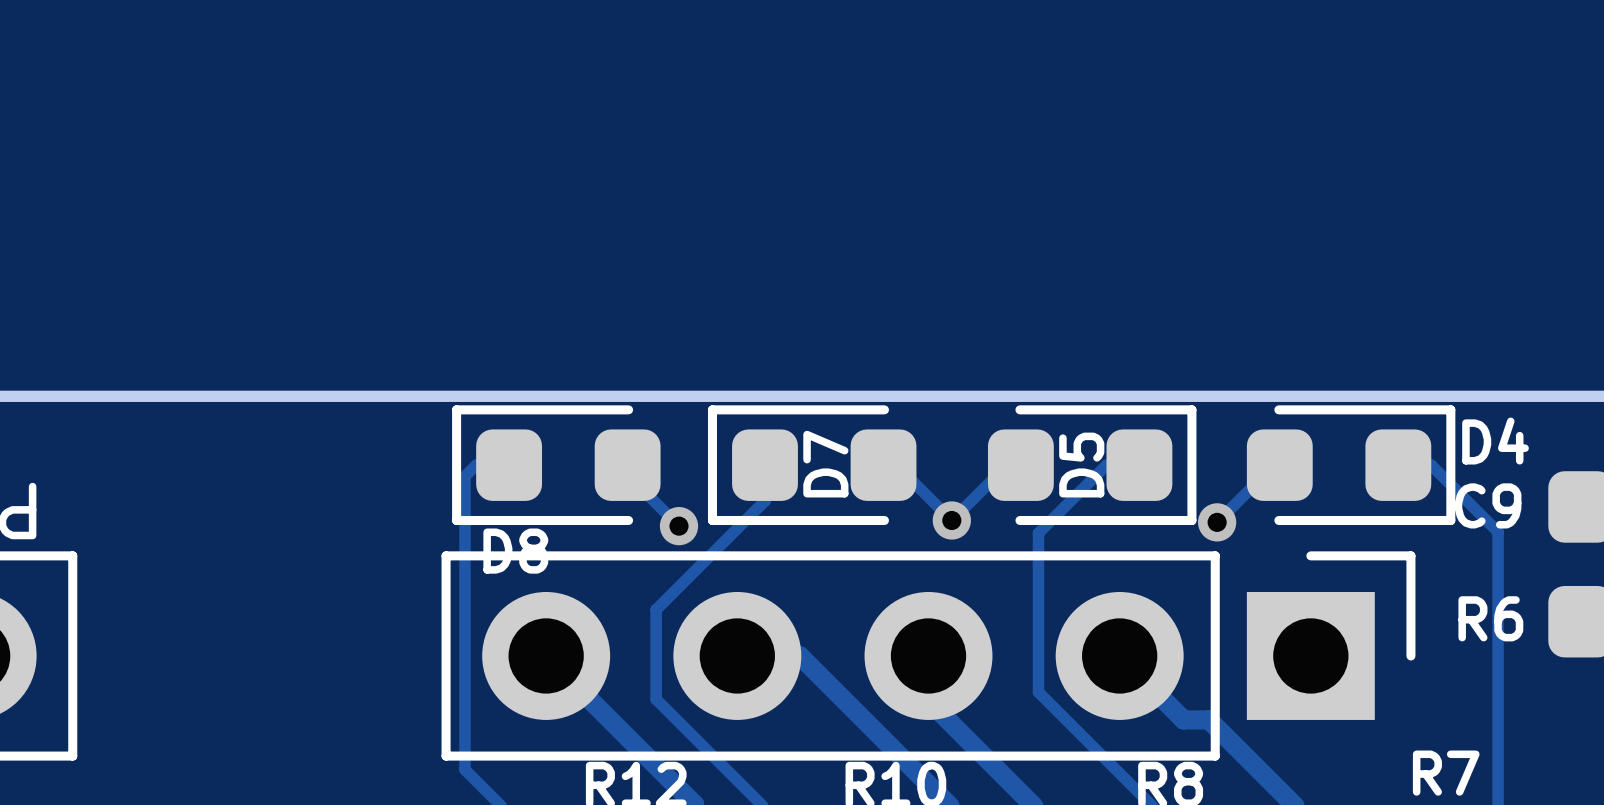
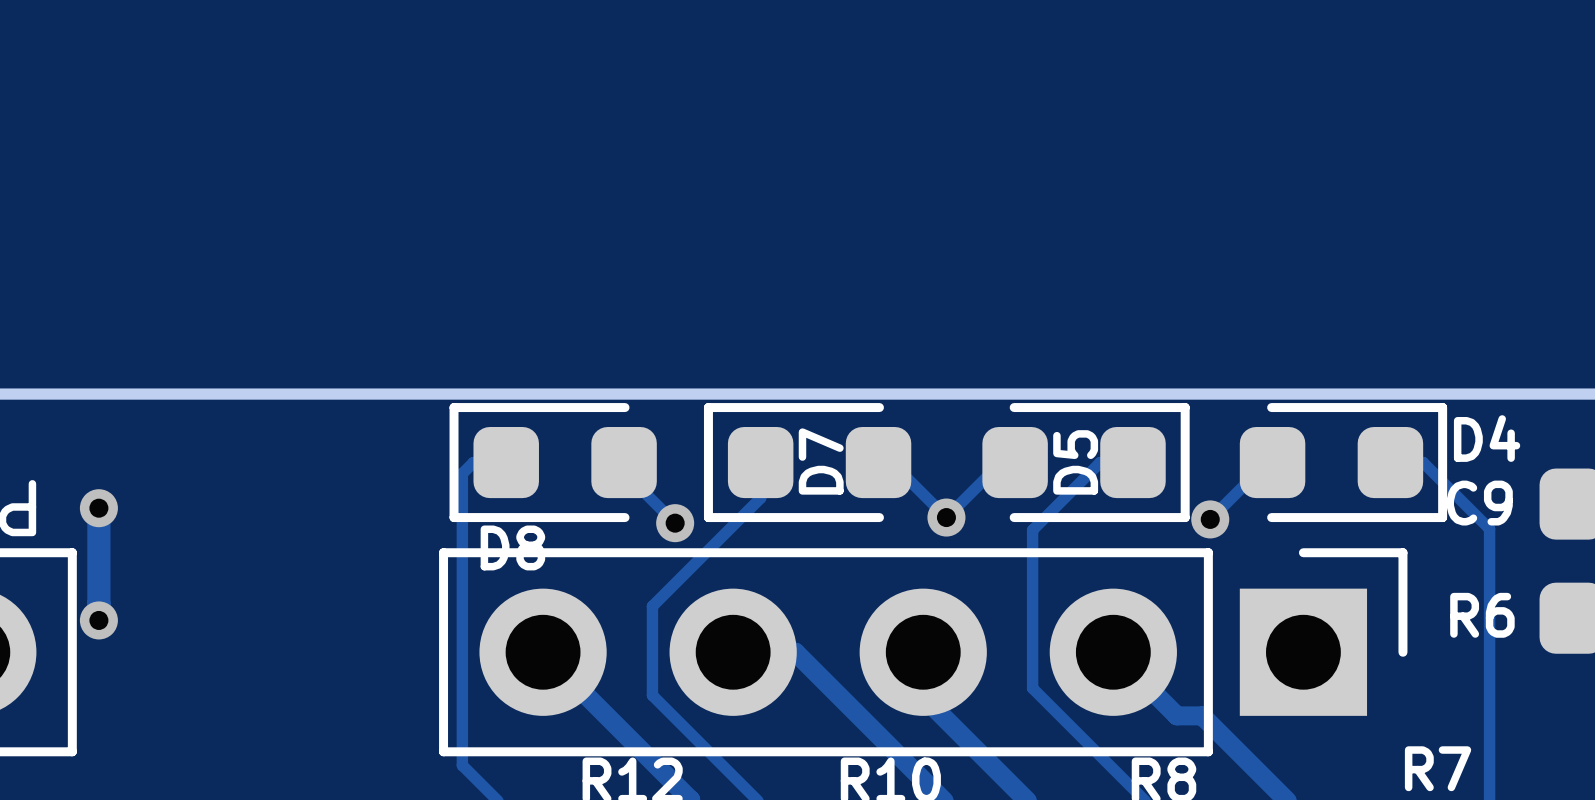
track: none -> (98, 508) (98, 620)
via: none -> (98, 508)
via: none -> (98, 620)

